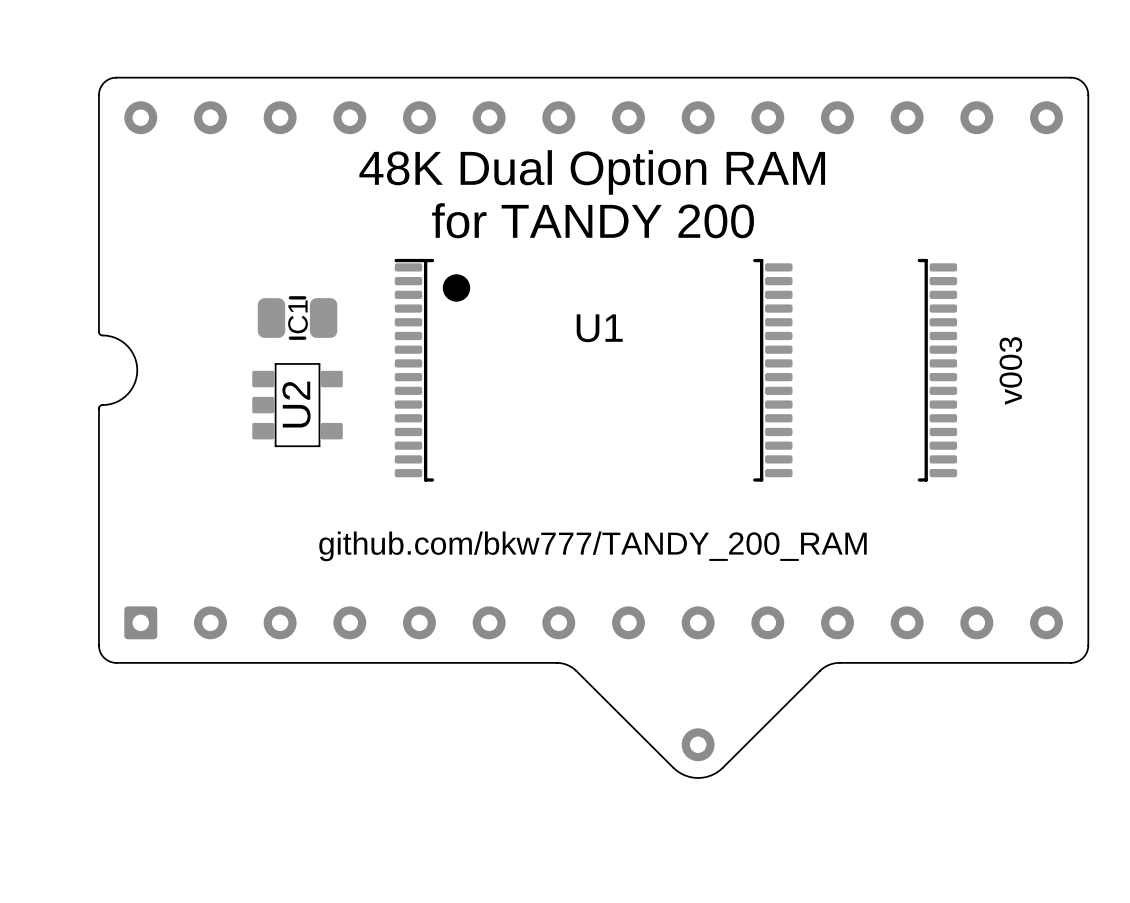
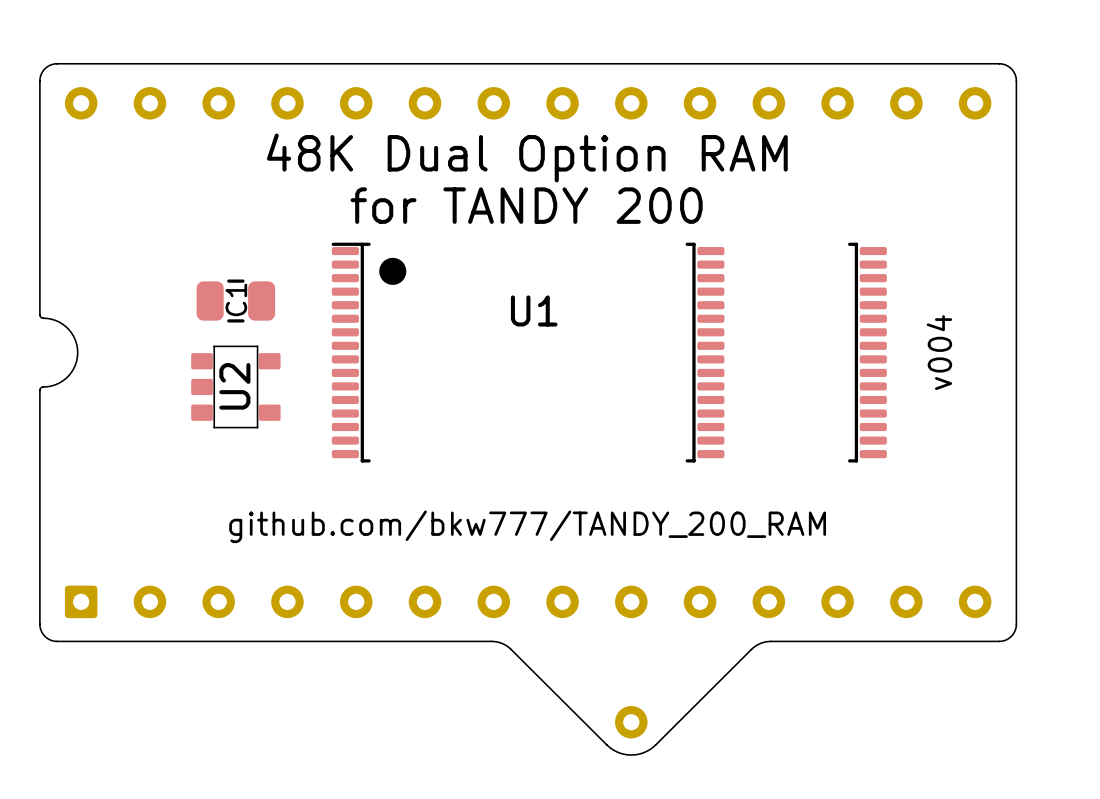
text: v003 (1010, 370) -> v004 (939, 352)

